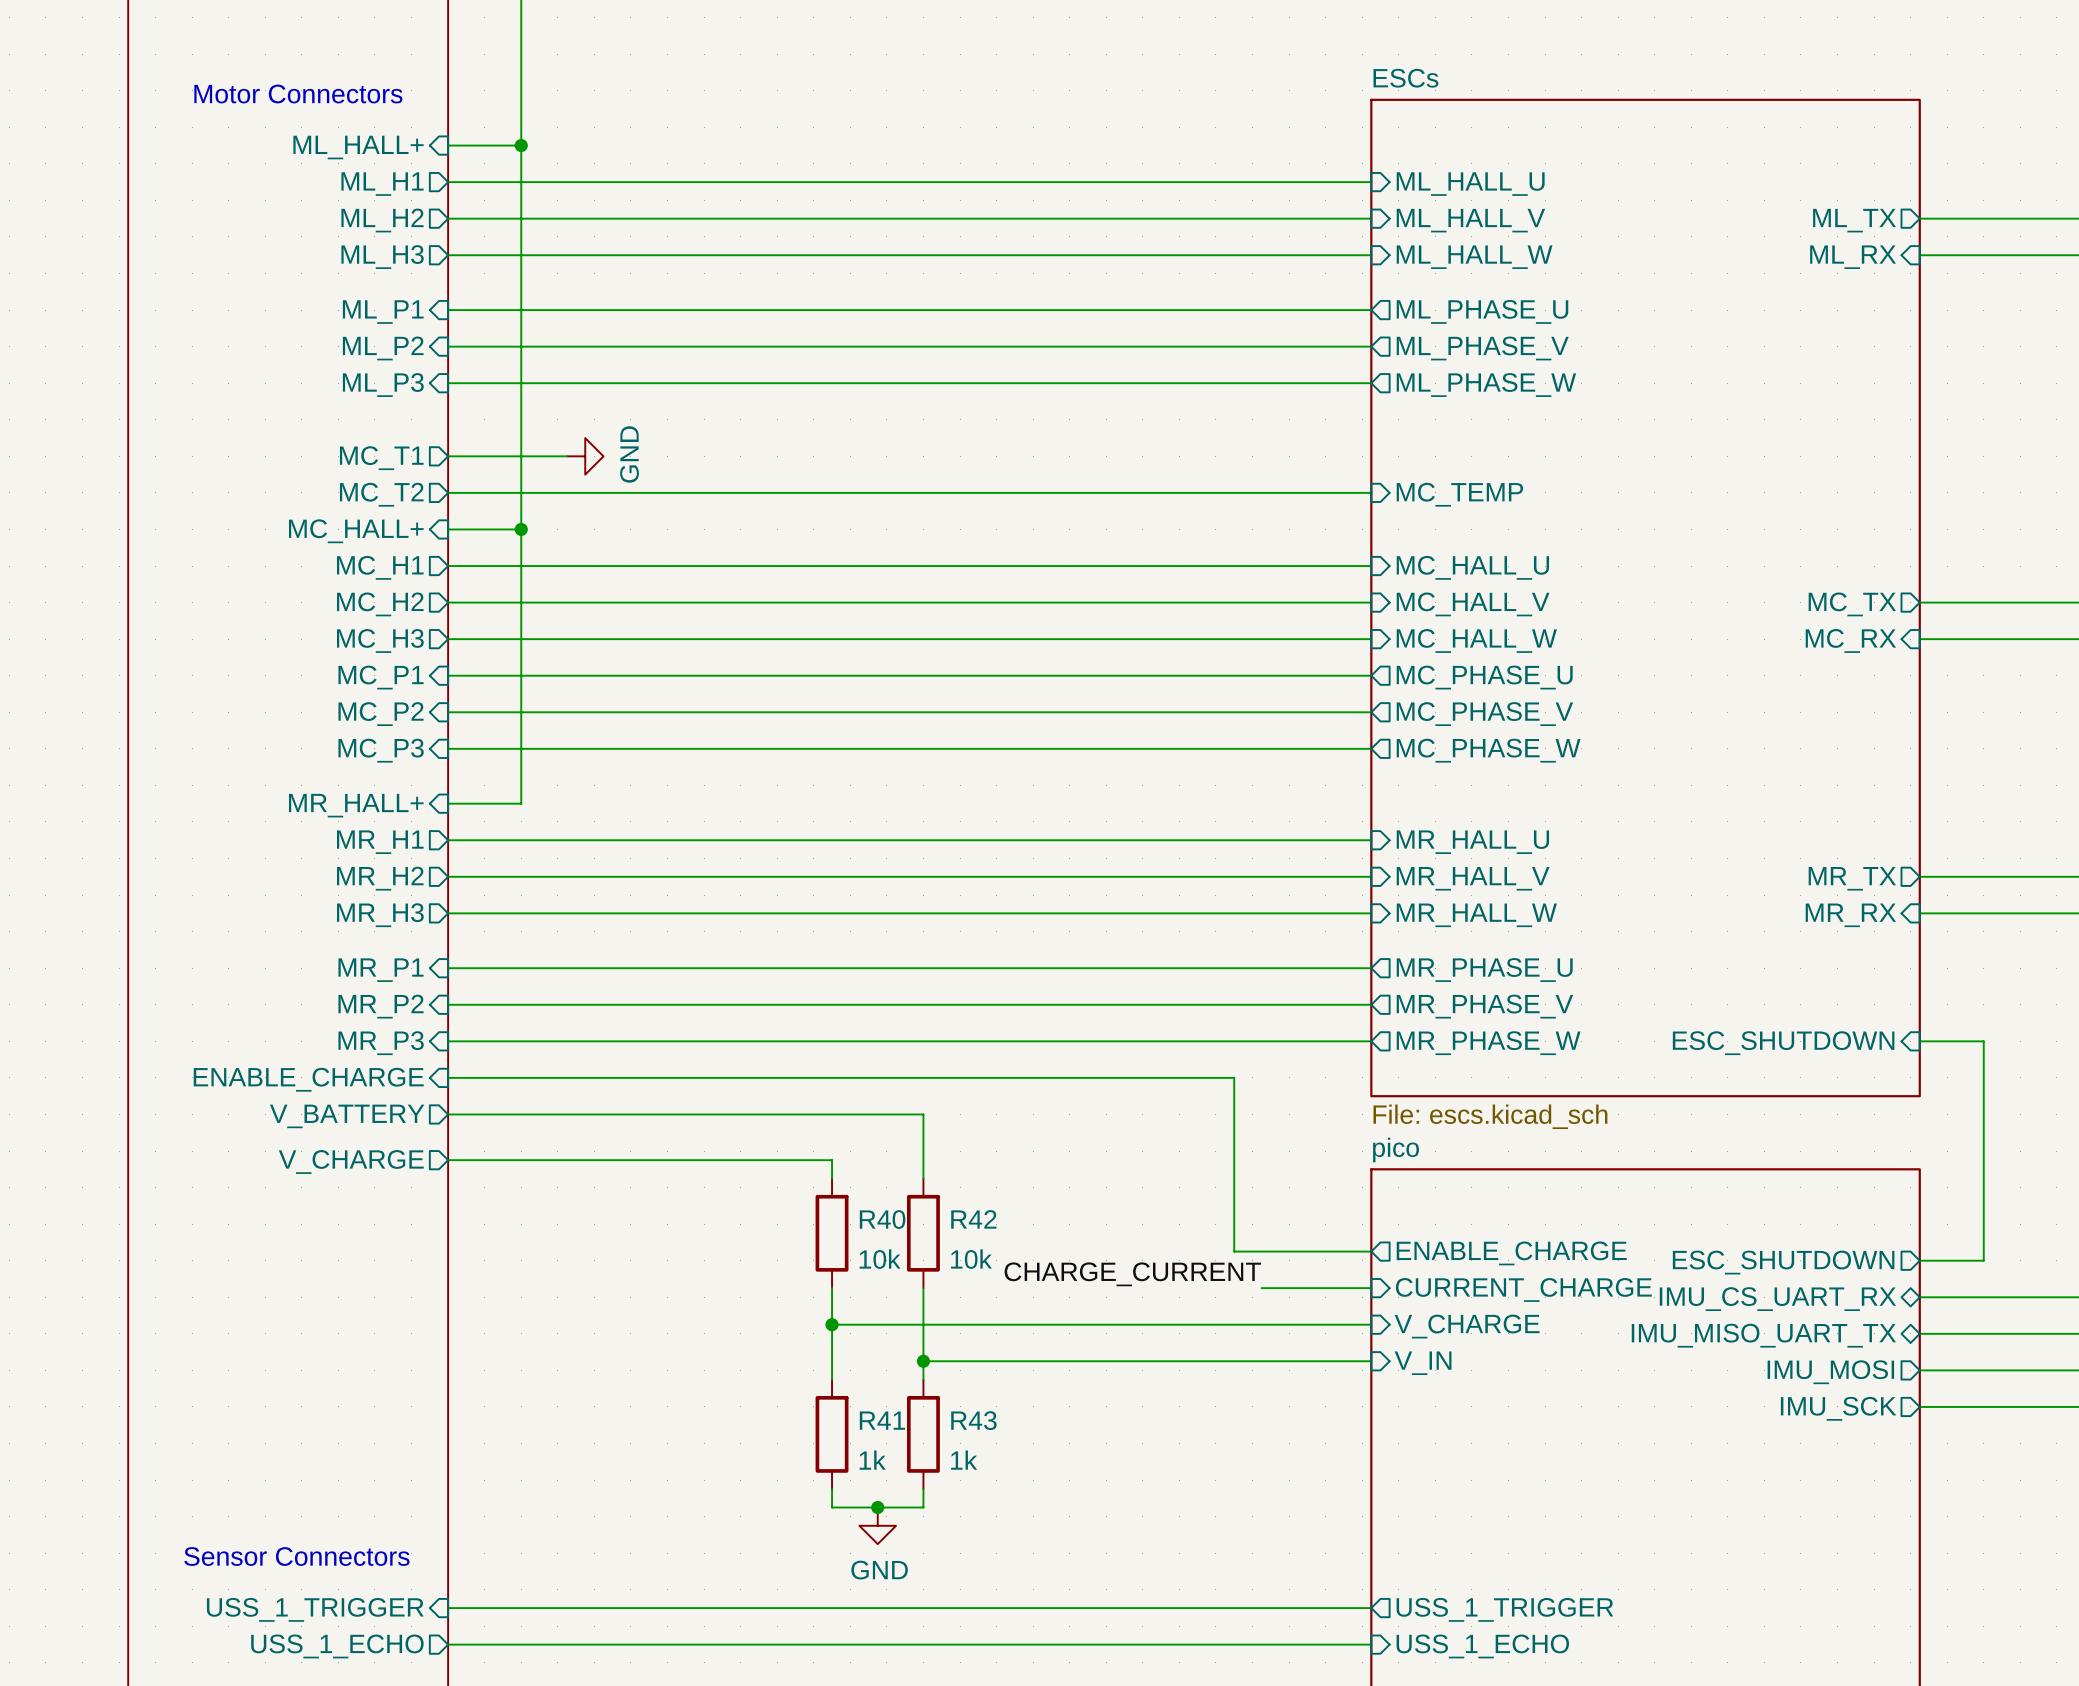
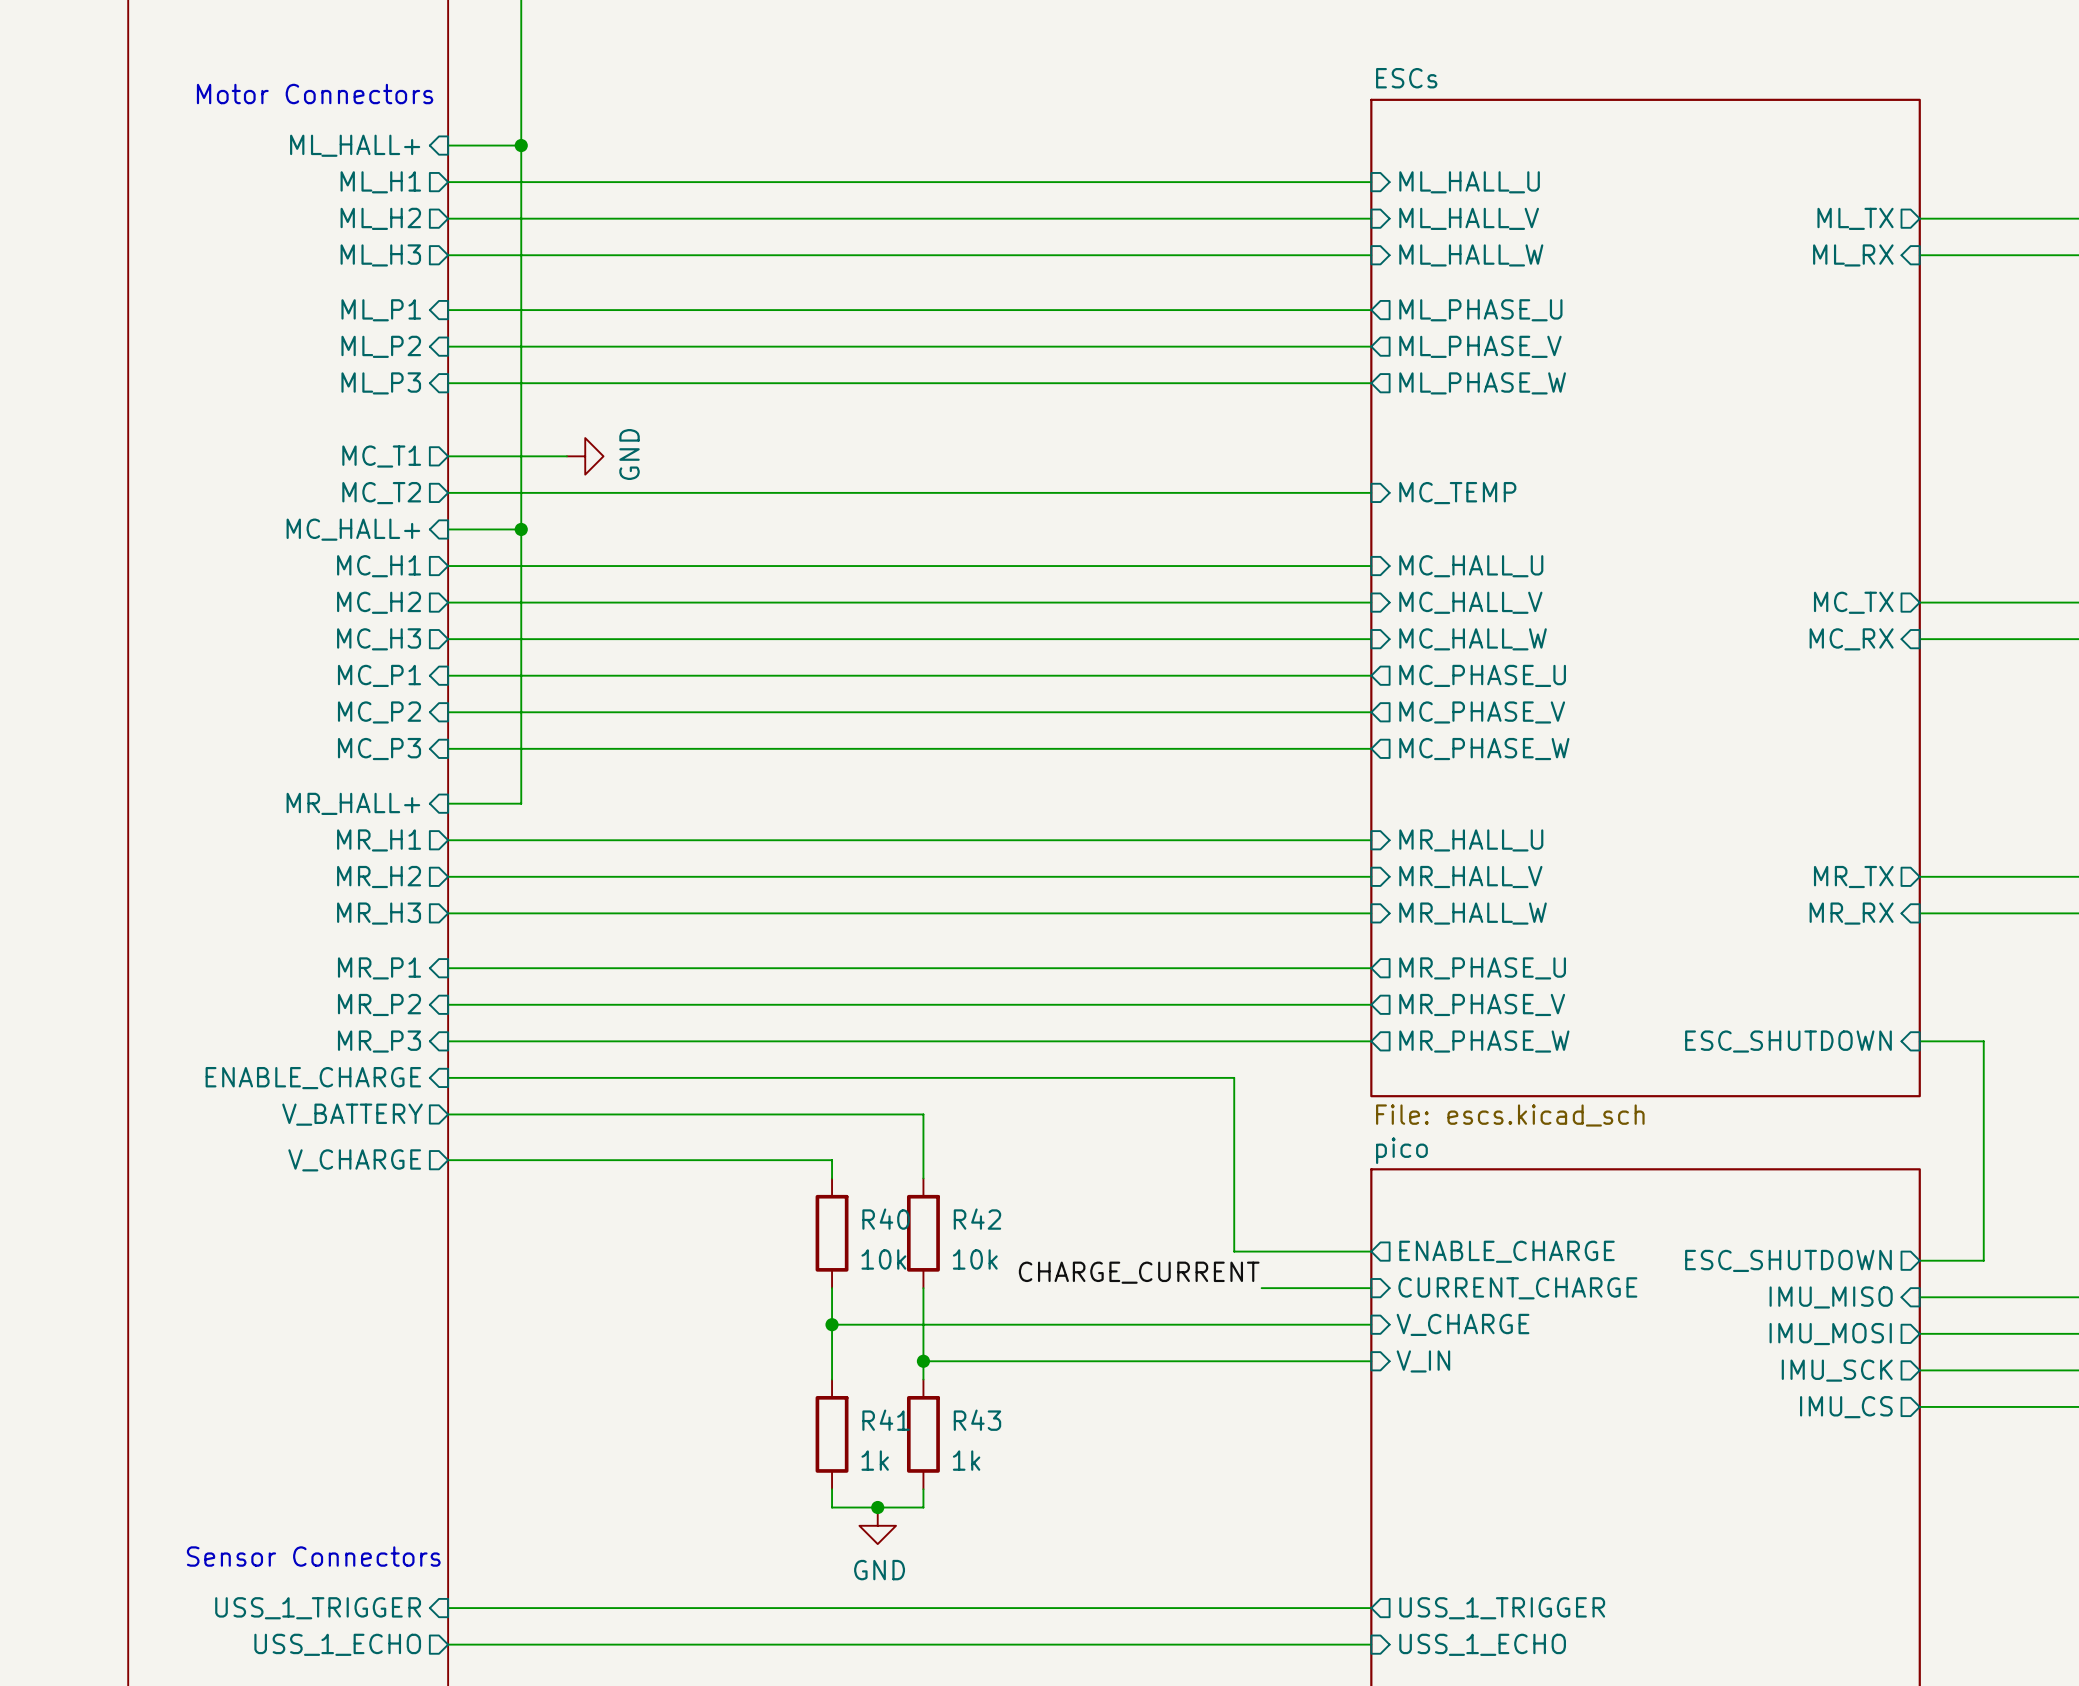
sheet pin shape: bidirectional (1777, 1299) -> input (1831, 1297)
sheet pin: IMU_CS_UART_RX (1777, 1299) -> IMU_MISO (1831, 1297)
sheet pin shape: bidirectional (1763, 1335) -> output (1830, 1334)
sheet pin: IMU_MISO_UART_TX (1763, 1335) -> IMU_MOSI (1830, 1334)
sheet pin: IMU_MOSI (1830, 1372) -> IMU_SCK (1837, 1370)
sheet pin: IMU_SCK (1838, 1408) -> IMU_CS (1846, 1407)

